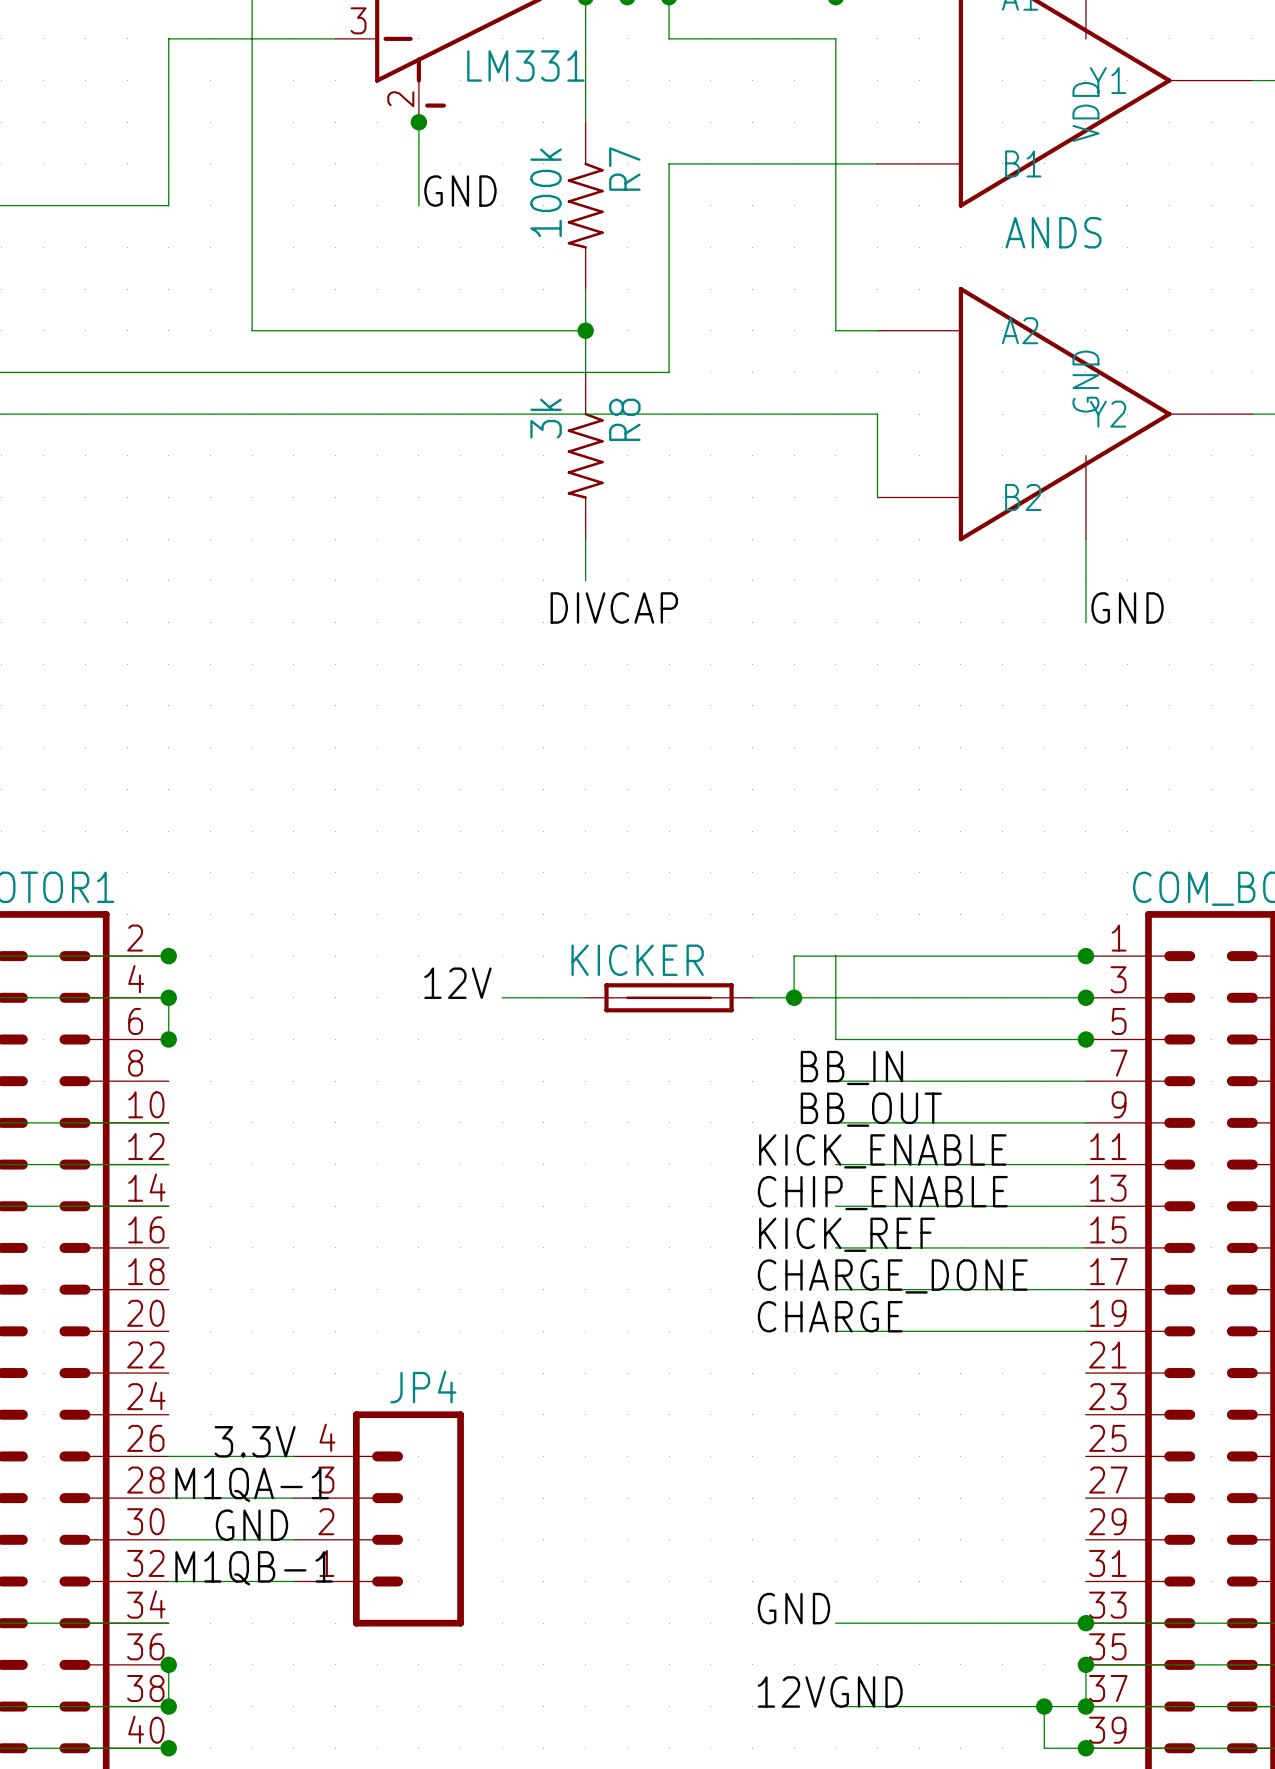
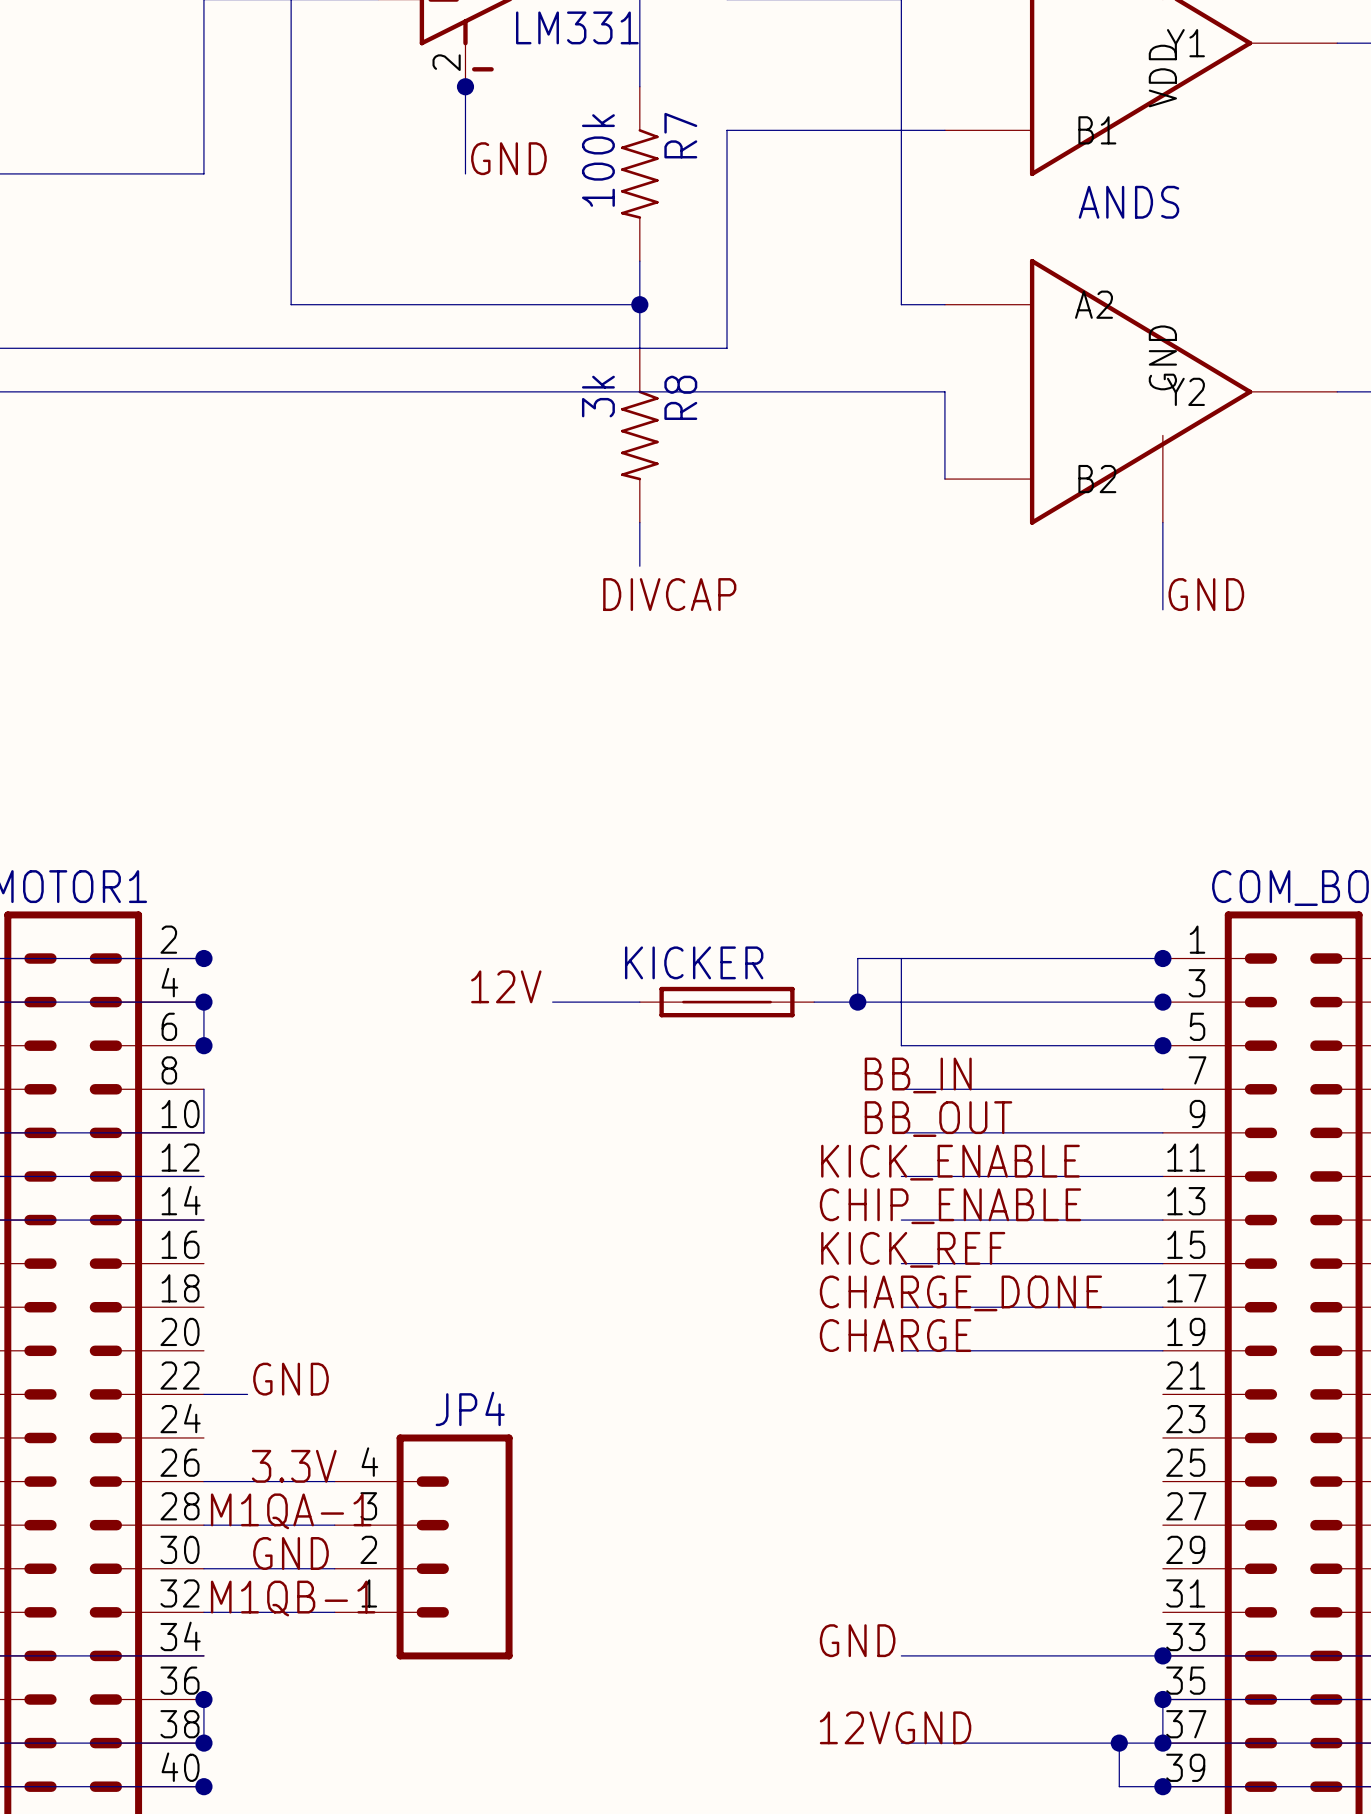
wire: none -> (203, 1089) (203, 1132)
label: none -> GND (290, 1379)
wire: none -> (203, 1394) (247, 1394)

